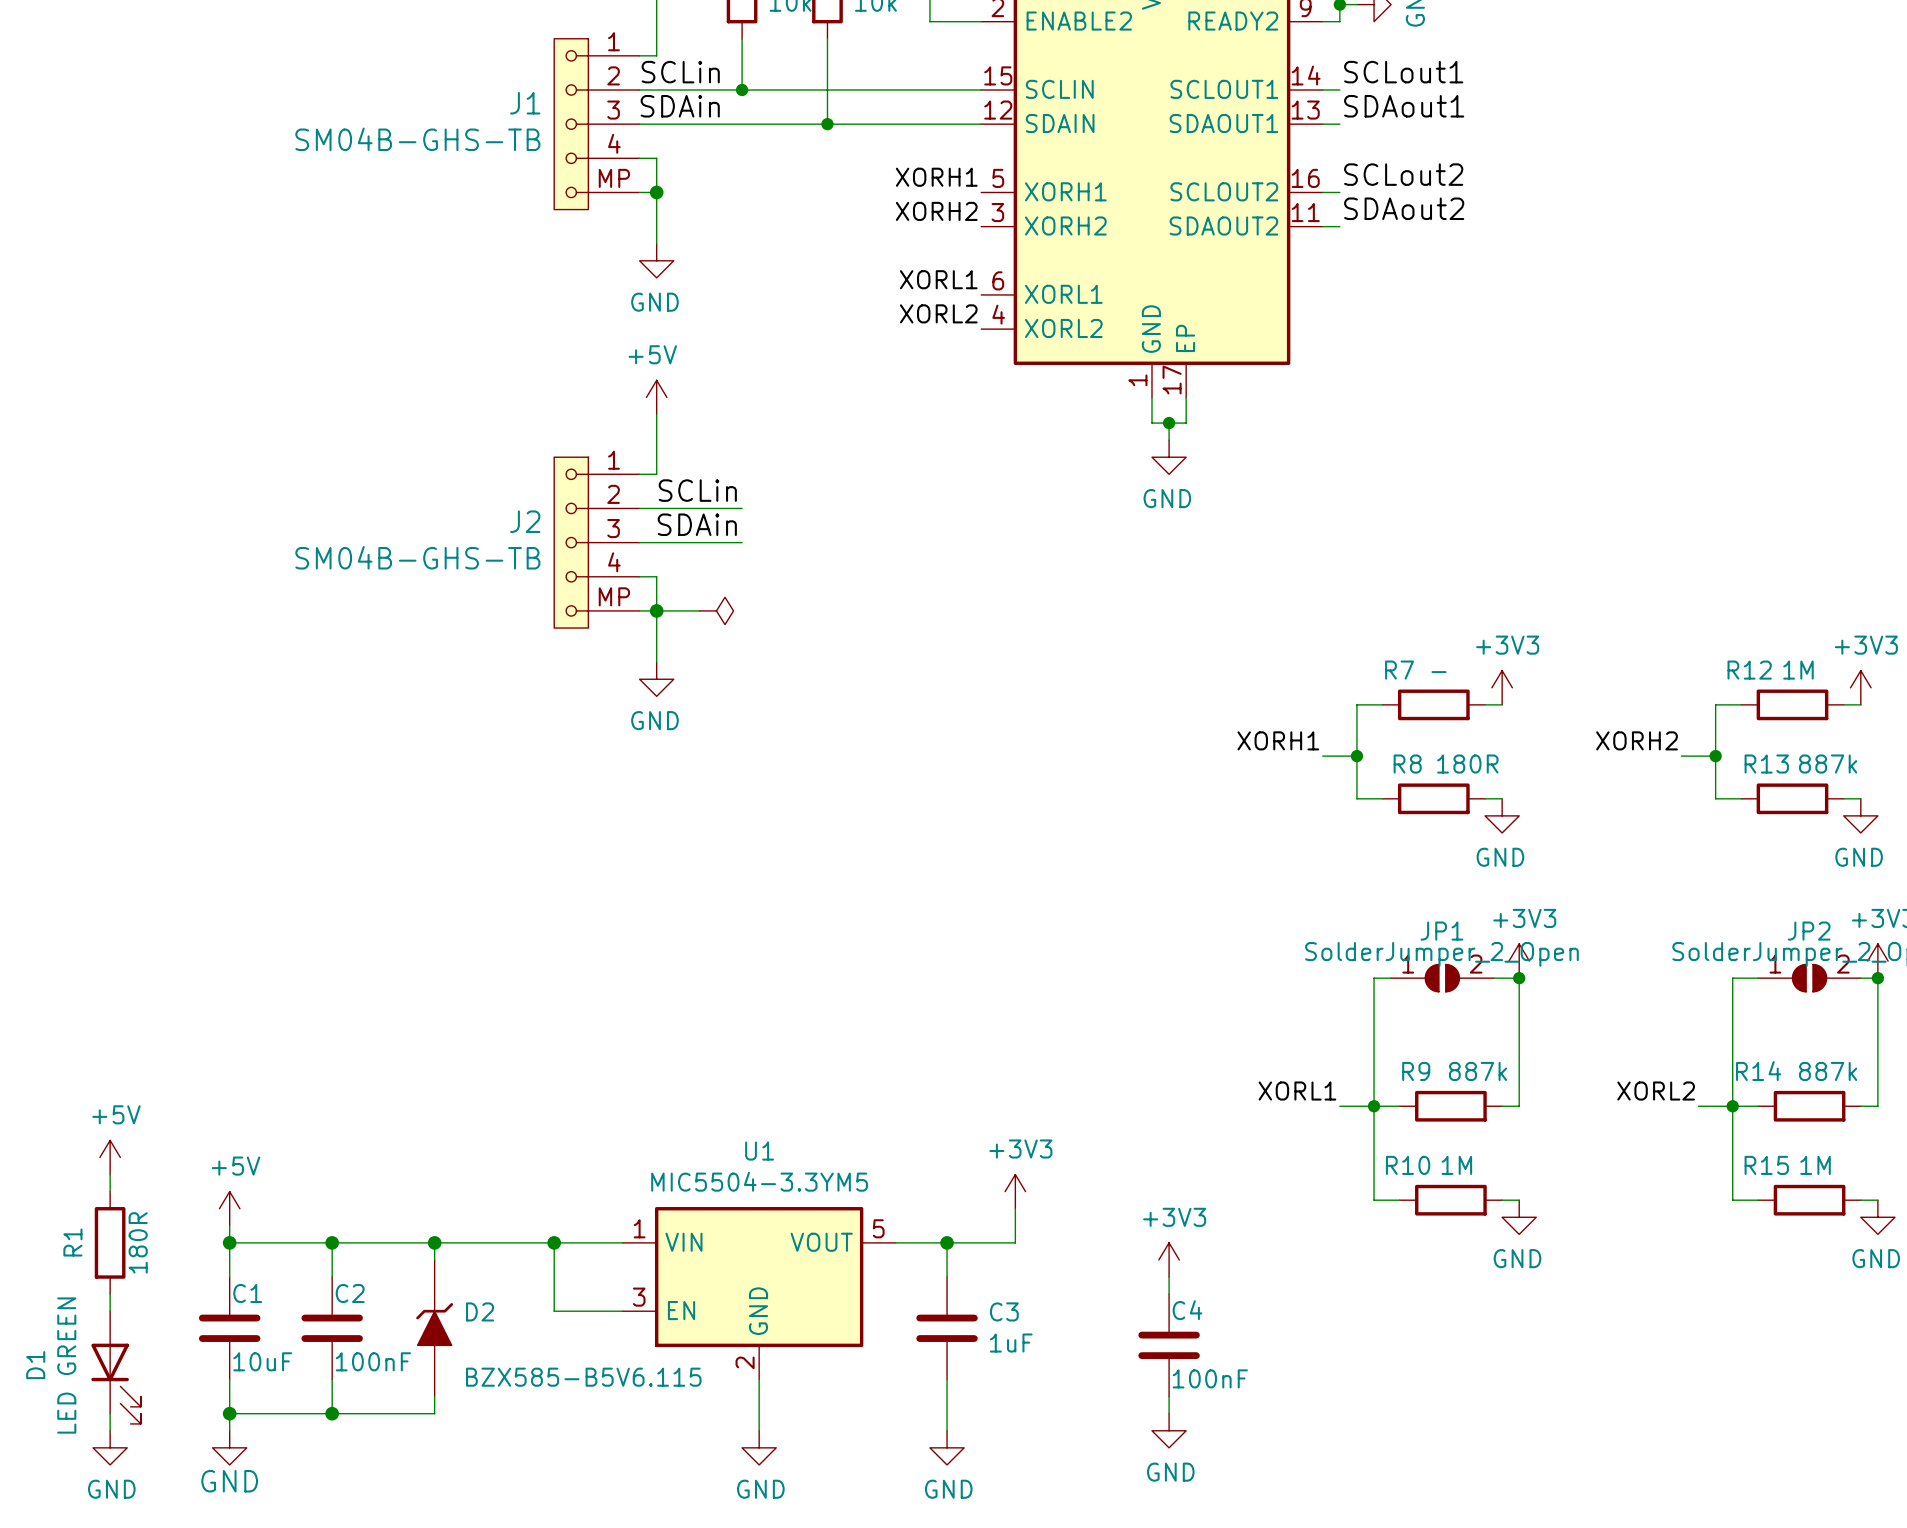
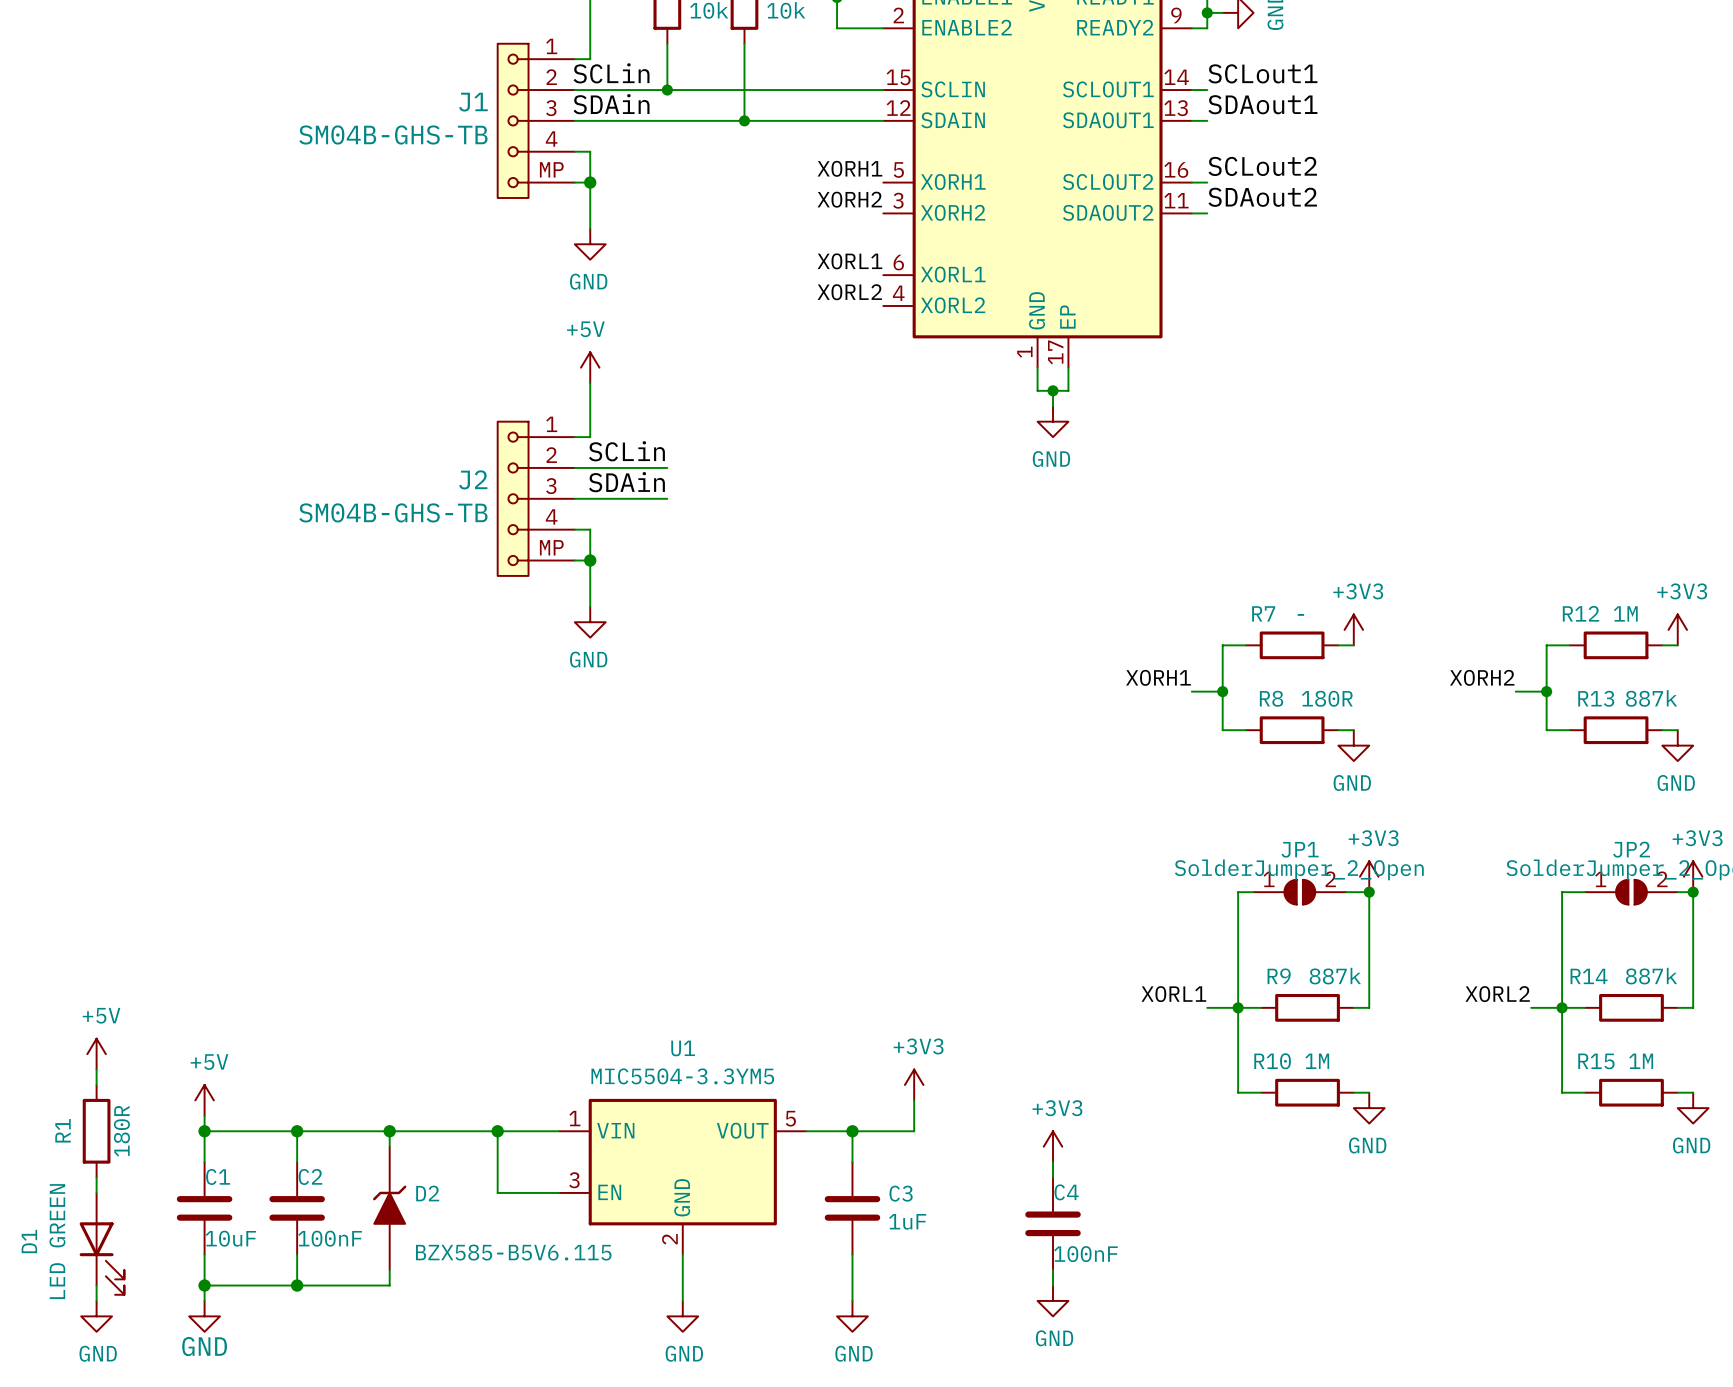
wire: (656, 610) (699, 610) -> none
power symbol: (716, 610) -> none

